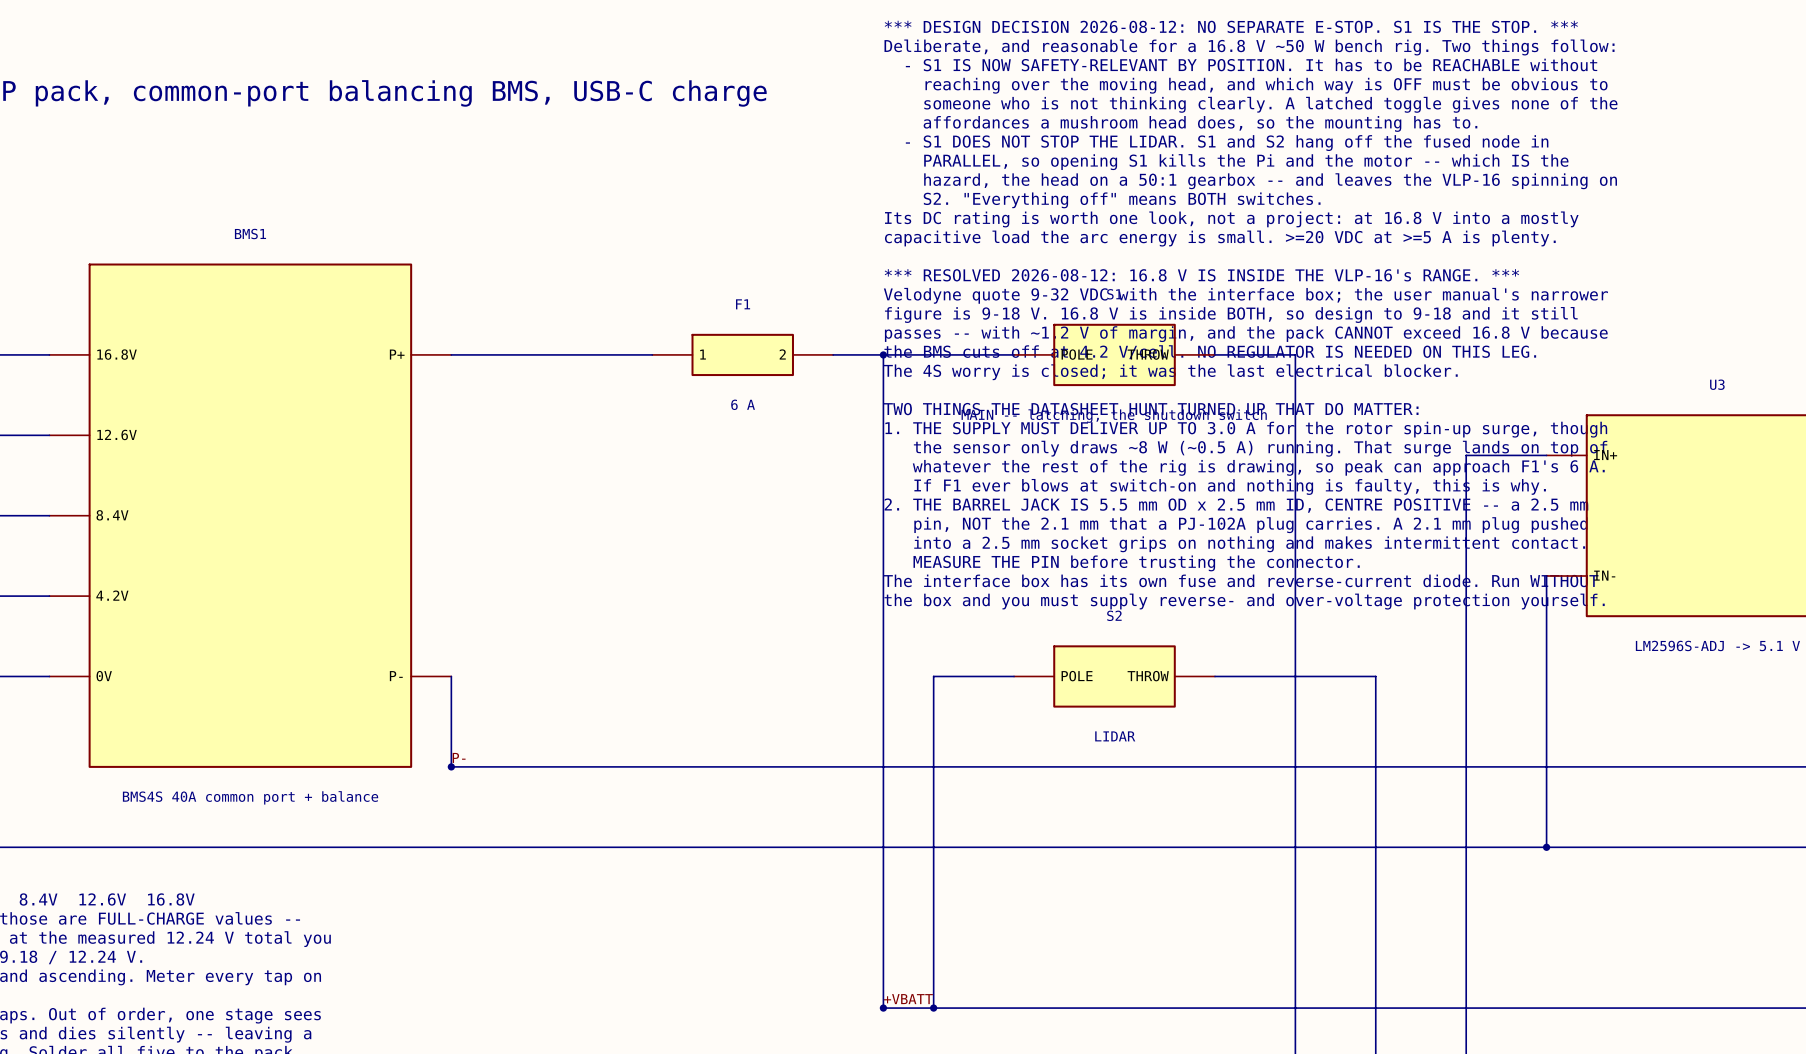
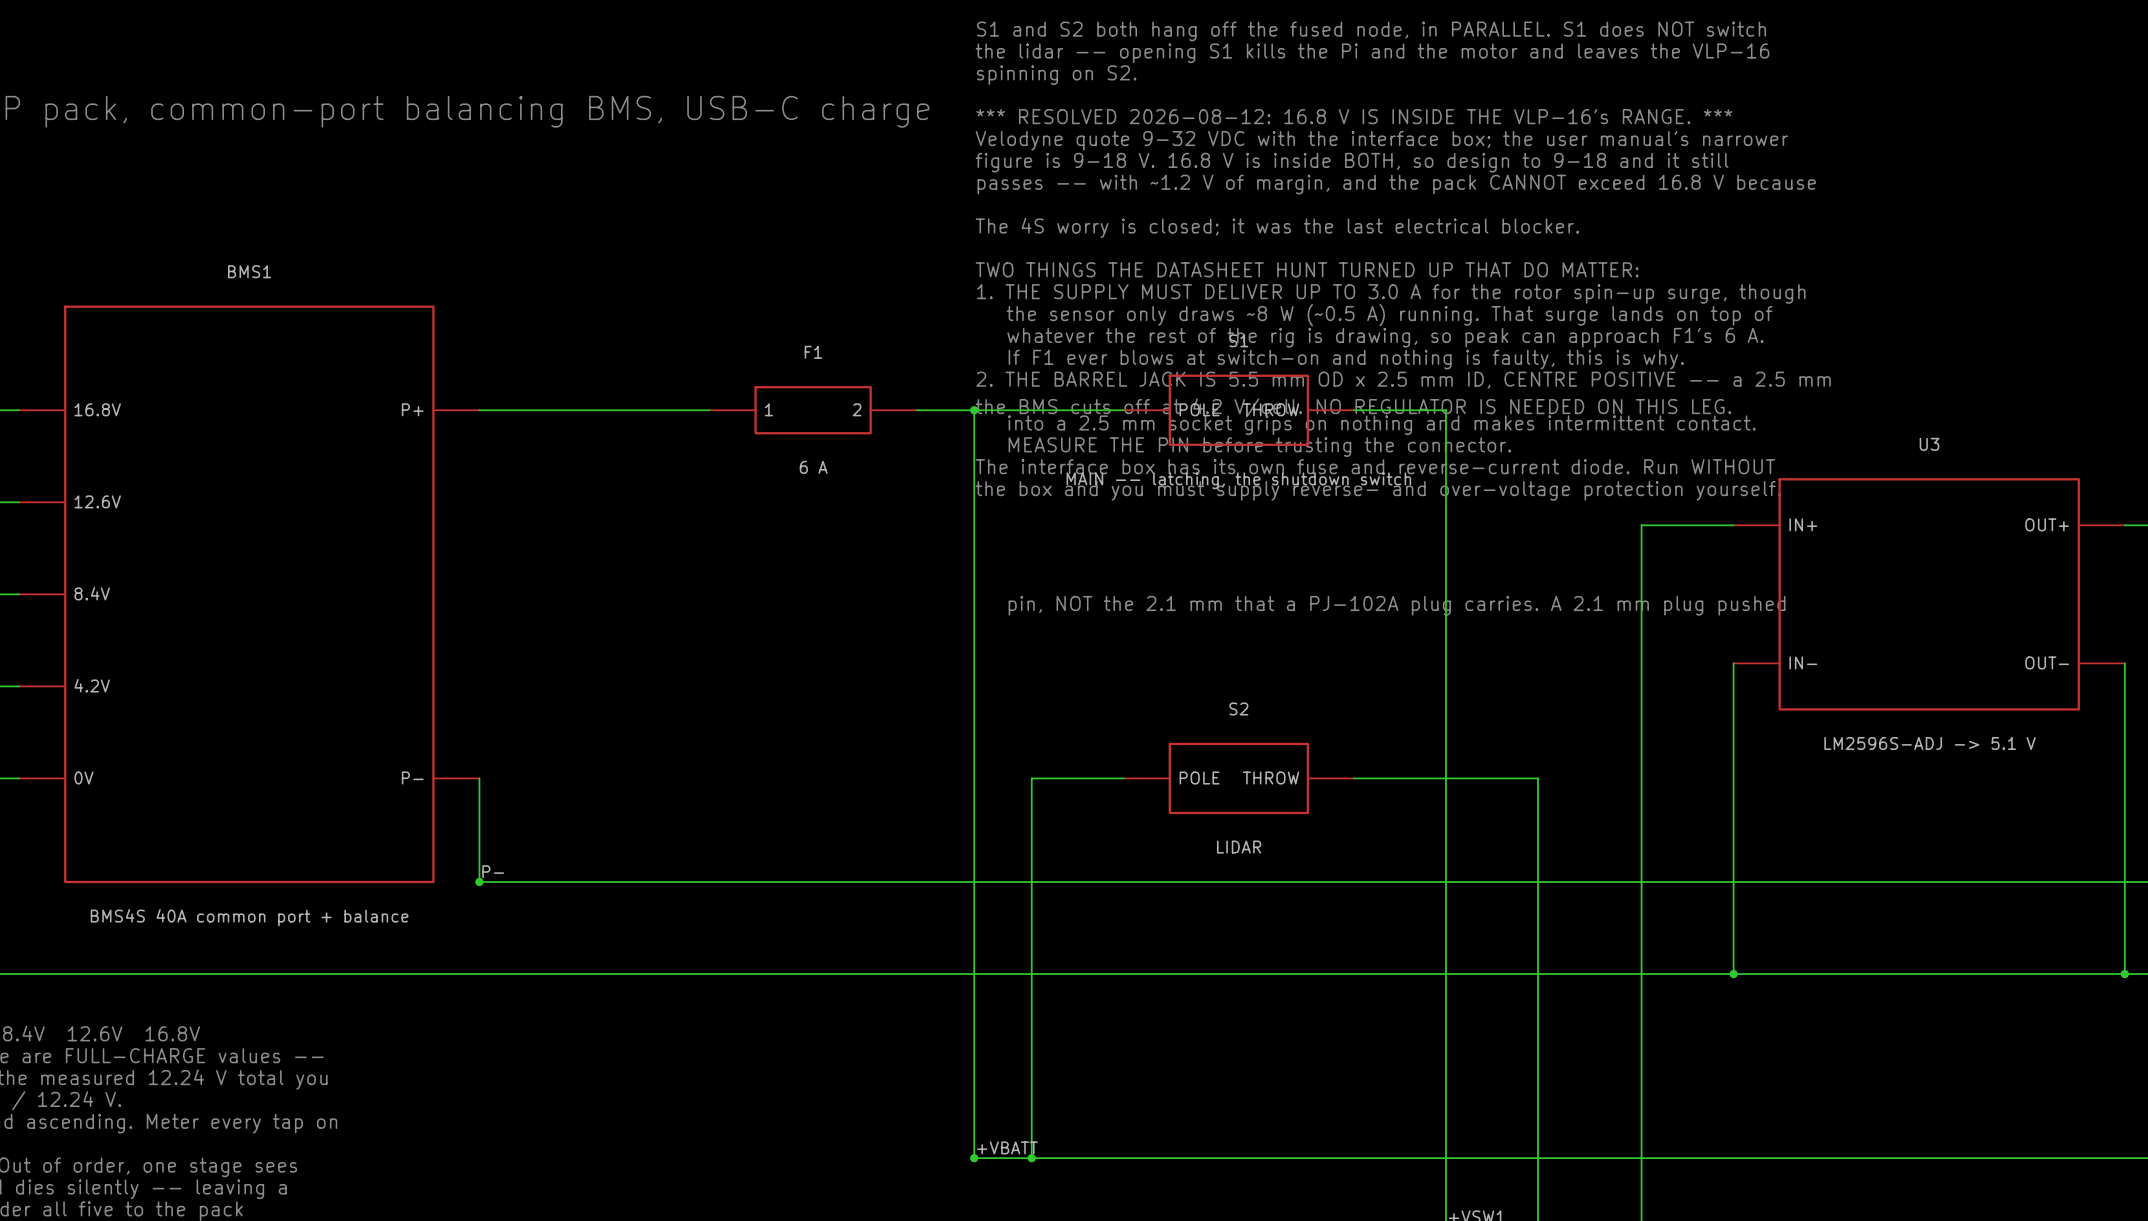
text: *** DESIGN DECISION 2026-08-12: NO SEPARATE E-STOP. S1 IS THE STOP. *** (1231, 26) -> S1 and S2 both hang off the fused node, in PARALLEL. S1 does NOT switch (1371, 31)
text: Deliberate, and reasonable for a 16.8 V ~50 W bench rig. Two things follow: (1249, 47) -> the lidar -- opening S1 kills the Pi and the motor and leaves the VLP-16 (1372, 53)
text: - S1 IS NOW SAFETY-RELEVANT BY POSITION. It has to be REACHABLE without (1251, 64) -> spinning on S2. (1056, 75)
text: reaching over the moving head, and which way is OFF must be obvious to (1266, 85) -> none
text: someone who is not thinking clearly. A latched toggle gives none of the (1270, 104) -> none
text: affordances a mushroom head does, so the mounting has to. (1200, 123) -> none
text: - S1 DOES NOT STOP THE LIDAR. S1 and S2 hang off the fused node in (1227, 143) -> none
text: PARALLEL, so opening S1 kills the Pi and the motor -- which IS the (1246, 162) -> none
text: hazard, the head on a 50:1 gearbox -- and leaves the VLP-16 spinning on (1270, 181) -> none
text: S2. "Everything off" means BOTH switches. (1122, 200) -> none
text: Its DC rating is worth one look, not a project: at 16.8 V into a mostly (1231, 219) -> none
text: capacitive load the arc energy is small. >=20 VDC at >=5 A is plenty. (1220, 238) -> none
text position: *** RESOLVED 2026-08-12: 16.8 V IS INSIDE THE VLP-16's RANGE. *** (1201, 275) -> *** RESOLVED 2026-08-12: 16.8 V IS INSIDE THE VLP-16's RANGE. *** (1354, 116)
text position: Velodyne quote 9-32 VDC with the interface box; the user manual's narrower (1245, 295) -> Velodyne quote 9-32 VDC with the interface box; the user manual's narrower (1381, 140)
text position: figure is 9-18 V. 16.8 V is inside BOTH, so design to 9-18 and it still (1231, 314) -> figure is 9-18 V. 16.8 V is inside BOTH, so design to 9-18 and it still (1352, 162)
text position: passes -- with ~1.2 V of margin, and the pack CANNOT exceed 16.8 V because (1246, 334) -> passes -- with ~1.2 V of margin, and the pack CANNOT exceed 16.8 V because (1396, 184)
text position: The 4S worry is closed; it was the last electrical blocker. (1170, 372) -> The 4S worry is closed; it was the last electrical blocker. (1277, 227)
text position: TWO THINGS THE DATASHEET HUNT TURNED UP THAT DO MATTER: (1151, 409) -> TWO THINGS THE DATASHEET HUNT TURNED UP THAT DO MATTER: (1307, 269)
text position: 1. THE SUPPLY MUST DELIVER UP TO 3.0 A for the rotor spin-up surge, though (1246, 429) -> 1. THE SUPPLY MUST DELIVER UP TO 3.0 A for the rotor spin-up surge, though (1391, 293)
text position: the sensor only draws ~8 W (~0.5 A) running. That surge lands on top of (1260, 448) -> the sensor only draws ~8 W (~0.5 A) running. That surge lands on top of (1389, 315)
text position: whatever the rest of the rig is drawing, so peak can approach F1's 6 A. (1258, 467) -> whatever the rest of the rig is drawing, so peak can approach F1's 6 A. (1385, 337)
text position: If F1 ever blows at switch-on and nothing is faulty, this is why. (1230, 486) -> If F1 ever blows at switch-on and nothing is faulty, this is why. (1346, 359)
text position: 2. THE BARREL JACK IS 5.5 mm OD x 2.5 mm ID, CENTRE POSITIVE -- a 2.5 mm (1236, 505) -> 2. THE BARREL JACK IS 5.5 mm OD x 2.5 mm ID, CENTRE POSITIVE -- a 2.5 mm (1403, 380)
text position: into a 2.5 mm socket grips on nothing and makes intermittent contact. (1249, 544) -> into a 2.5 mm socket grips on nothing and makes intermittent contact. (1381, 425)
text position: MEASURE THE PIN before trusting the connector. (1136, 563) -> MEASURE THE PIN before trusting the connector. (1259, 447)
text position: The interface box has its own fuse and reverse-current diode. Run WITHOUT (1241, 580) -> The interface box has its own fuse and reverse-current diode. Run WITHOUT (1375, 466)
text position: the box and you must supply reverse- and over-voltage protection yourself. (1244, 601) -> the box and you must supply reverse- and over-voltage protection yourself. (1378, 490)

